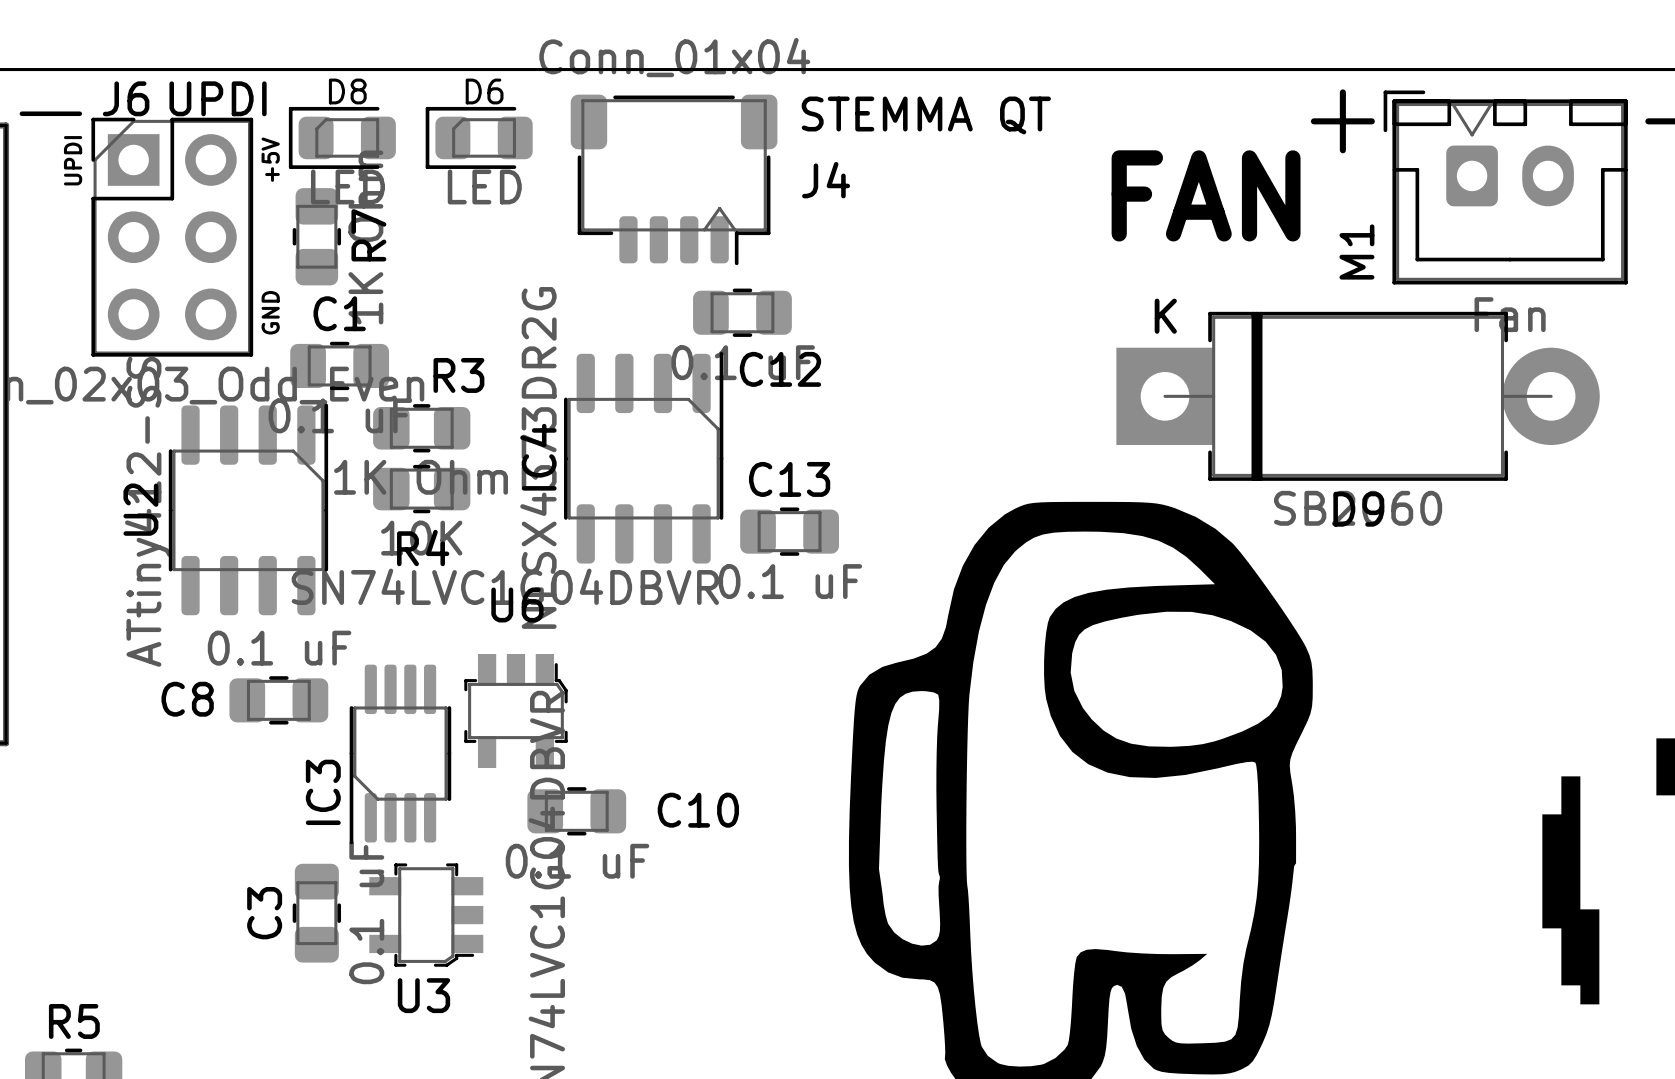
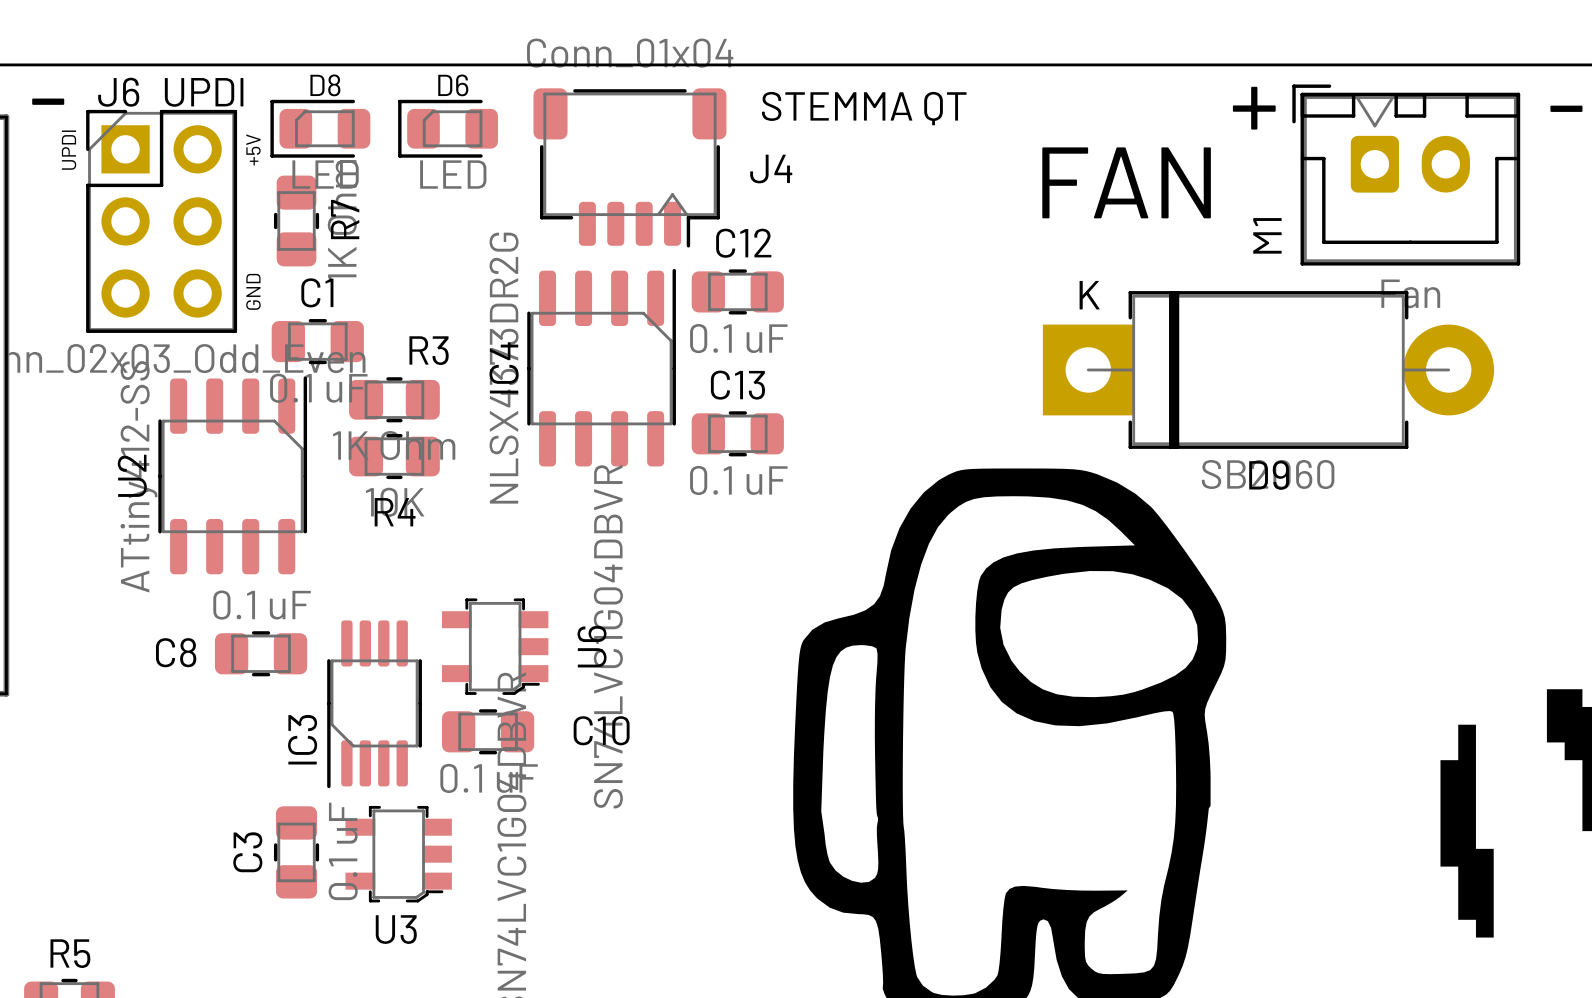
C12 position: (742, 312) -> (737, 291)
C12 name position: C12 (780, 369) -> C12 (743, 243)
IC4 position: (643, 457) -> (601, 367)
C13 position: (789, 531) -> (737, 433)
U6 rotation: 0° (515, 711) -> 90° clockwise (495, 646)
C10 position: (576, 811) -> (488, 731)

